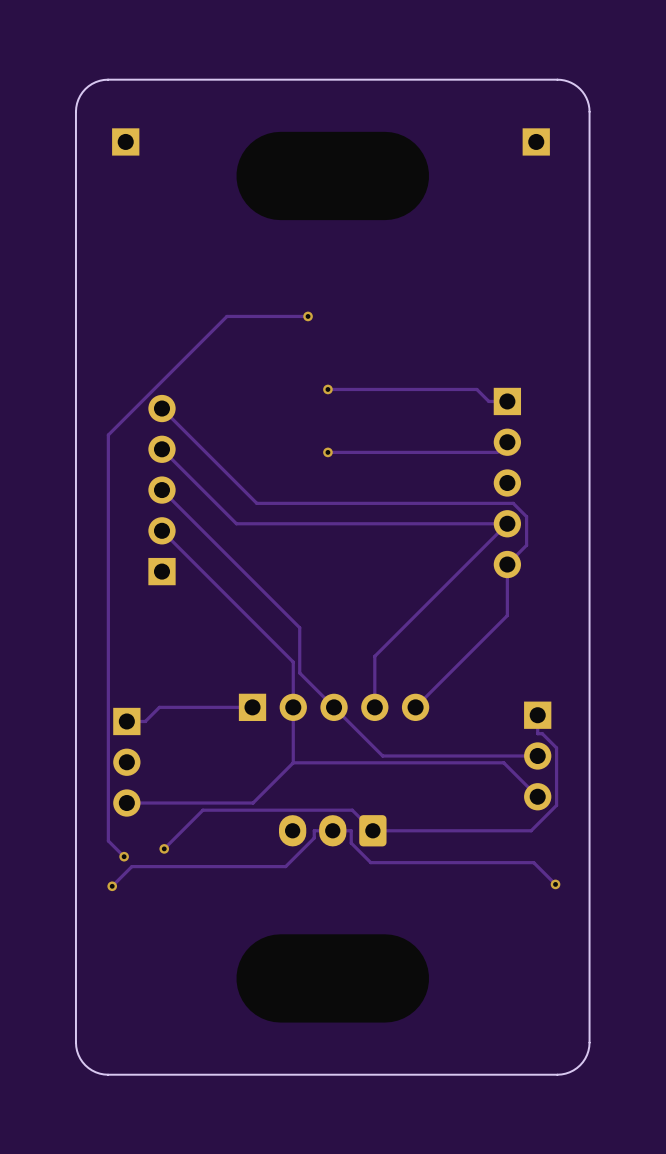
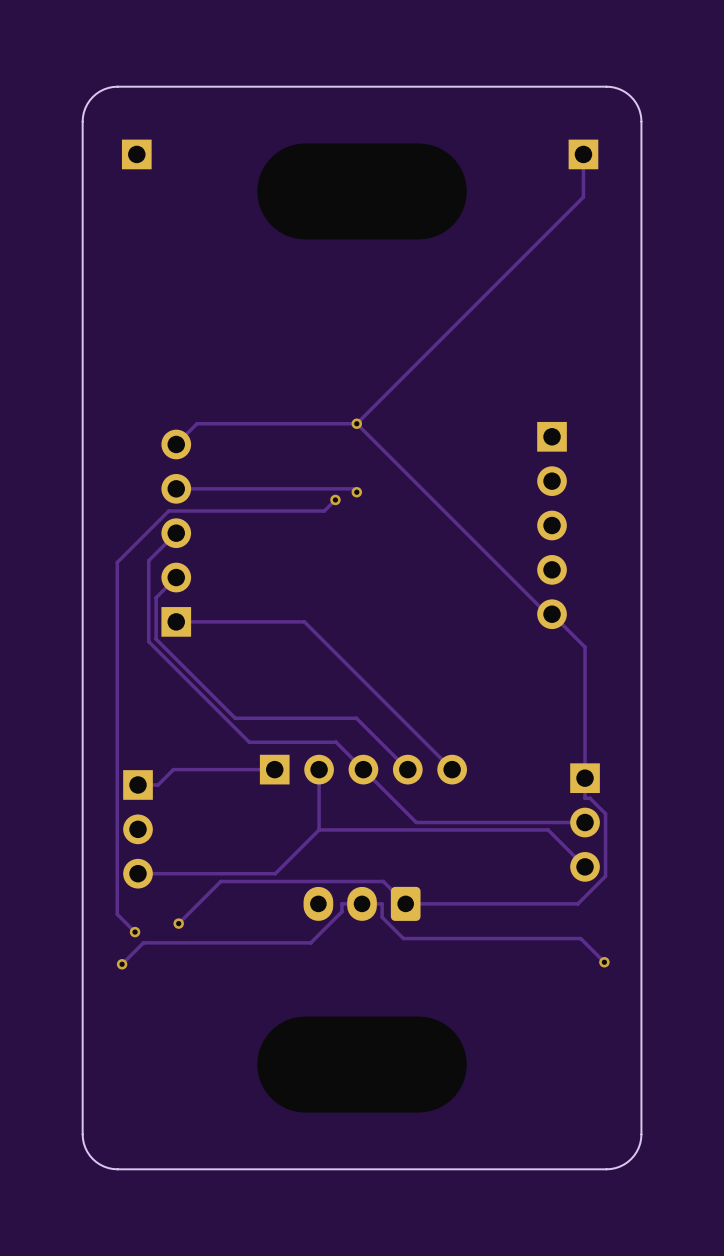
track: (308, 316) (226, 316) (108, 435) (108, 840) -> (335, 499) (324, 511) (168, 511) (117, 562) (117, 914)
via: (308, 316) -> none
track: (327, 389) (476, 389) (488, 401) (507, 401) -> (356, 423) (583, 197) (583, 154)
track: none -> (356, 423) (547, 614) (552, 614) (585, 647) (585, 778)
track: none -> (356, 423) (196, 423) (176, 444)
track: (162, 408) (256, 503) (513, 503) (526, 516) (526, 545) (507, 564) (507, 615) (415, 707) -> (176, 621) (304, 621) (452, 769)
track: (507, 442) (497, 452) (327, 452) -> (176, 488) (353, 488) (356, 492)
track: (162, 449) (236, 523) (507, 523) (374, 656) (374, 707) -> (176, 577) (156, 597) (156, 639) (235, 718) (356, 718) (407, 769)
via: none -> (335, 499)
track: (162, 490) (299, 627) (299, 673) (308, 682) -> (176, 533) (148, 560) (148, 641) (249, 742) (336, 742)
track: (162, 530) (293, 662) (293, 707) -> none

